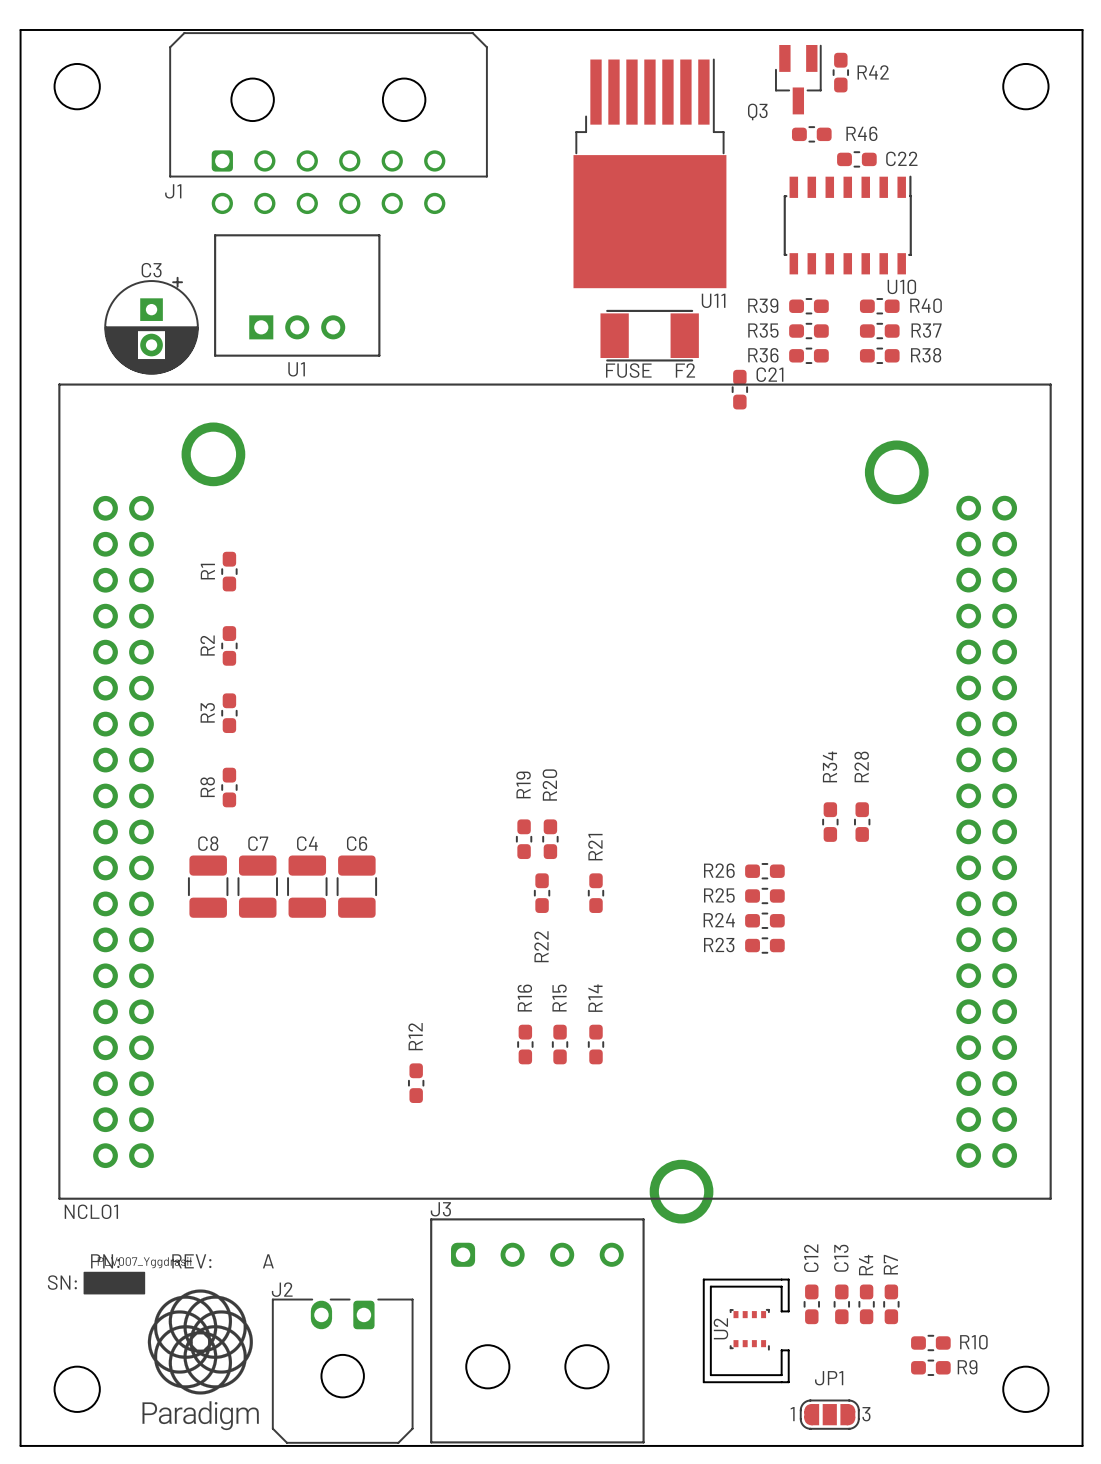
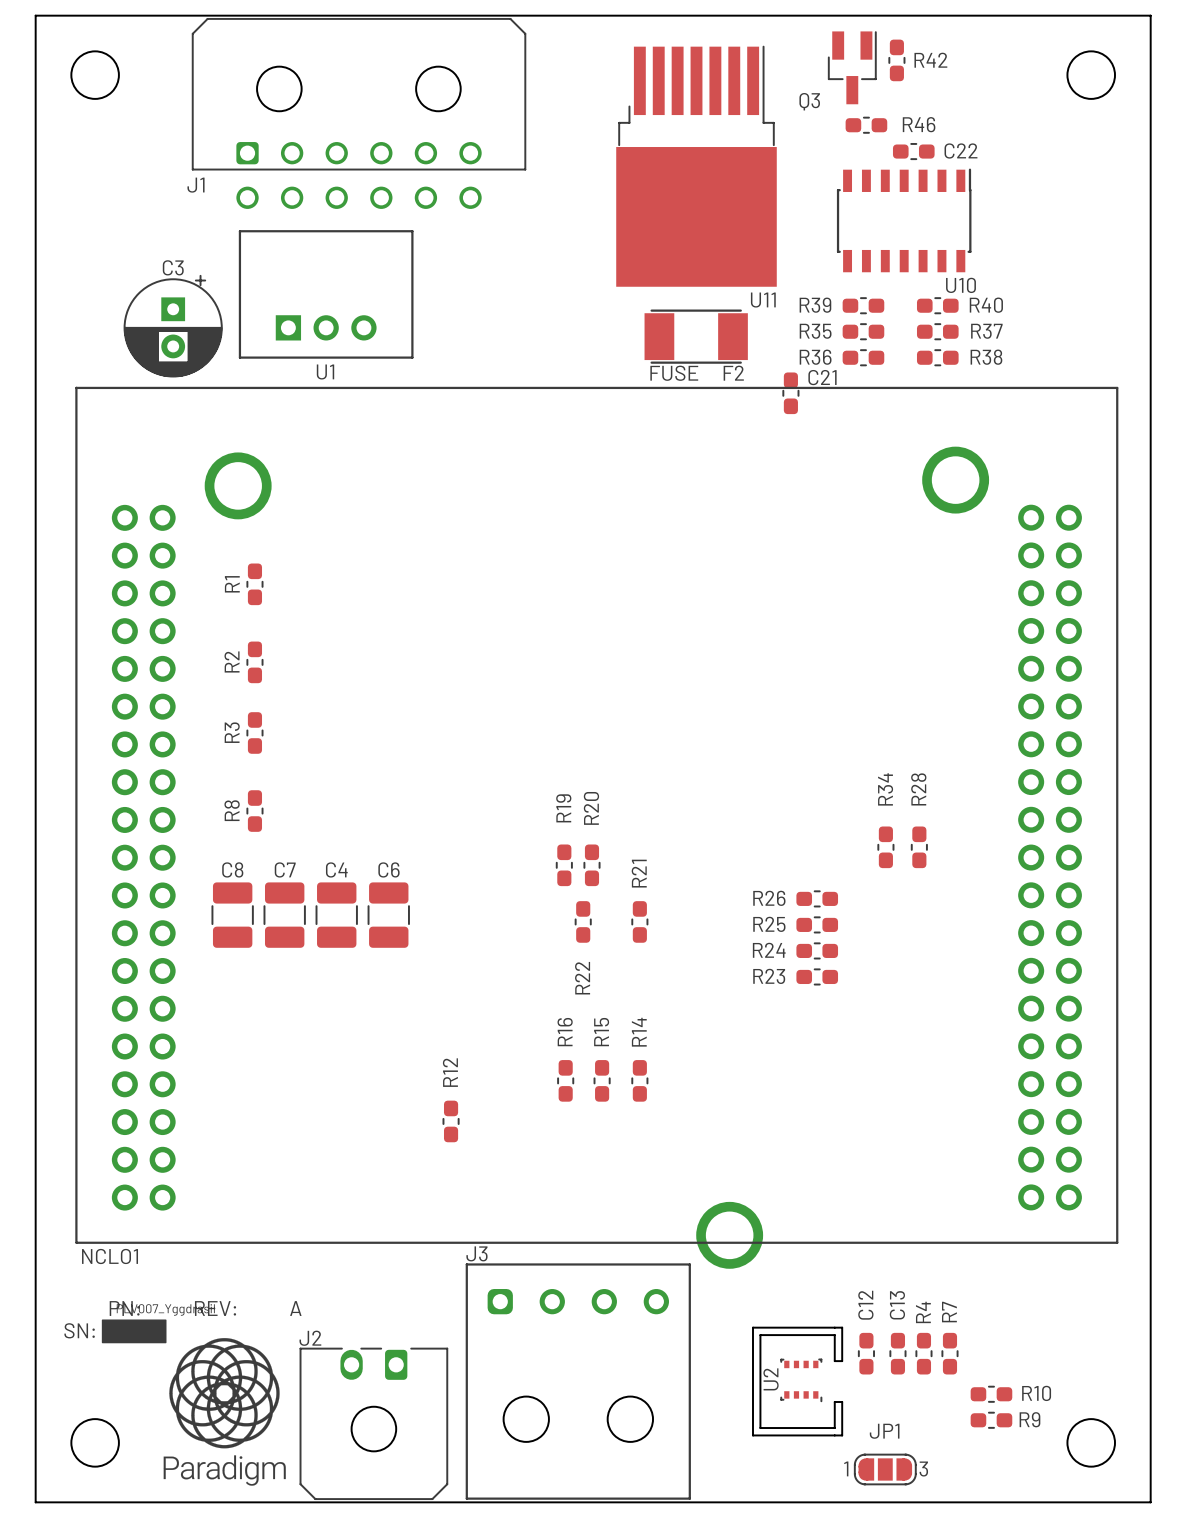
NCLO1 footprint: [58, 383, 1052, 1224] -> [75, 386, 1119, 1269]

